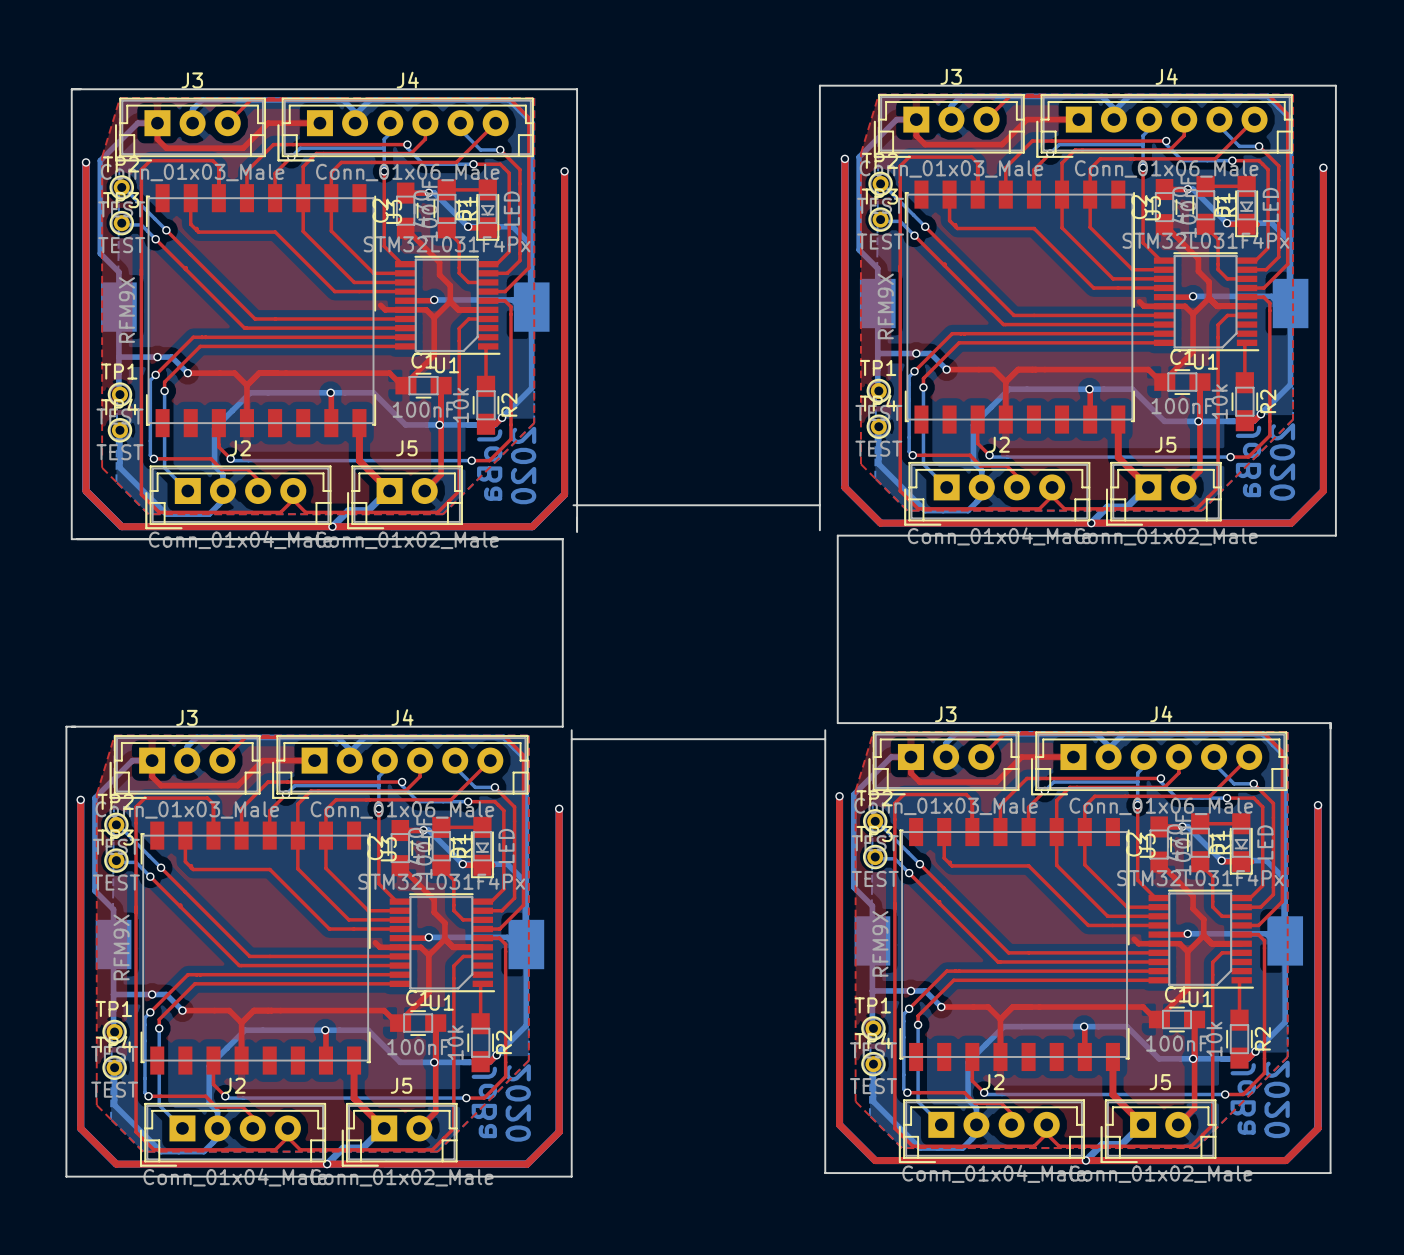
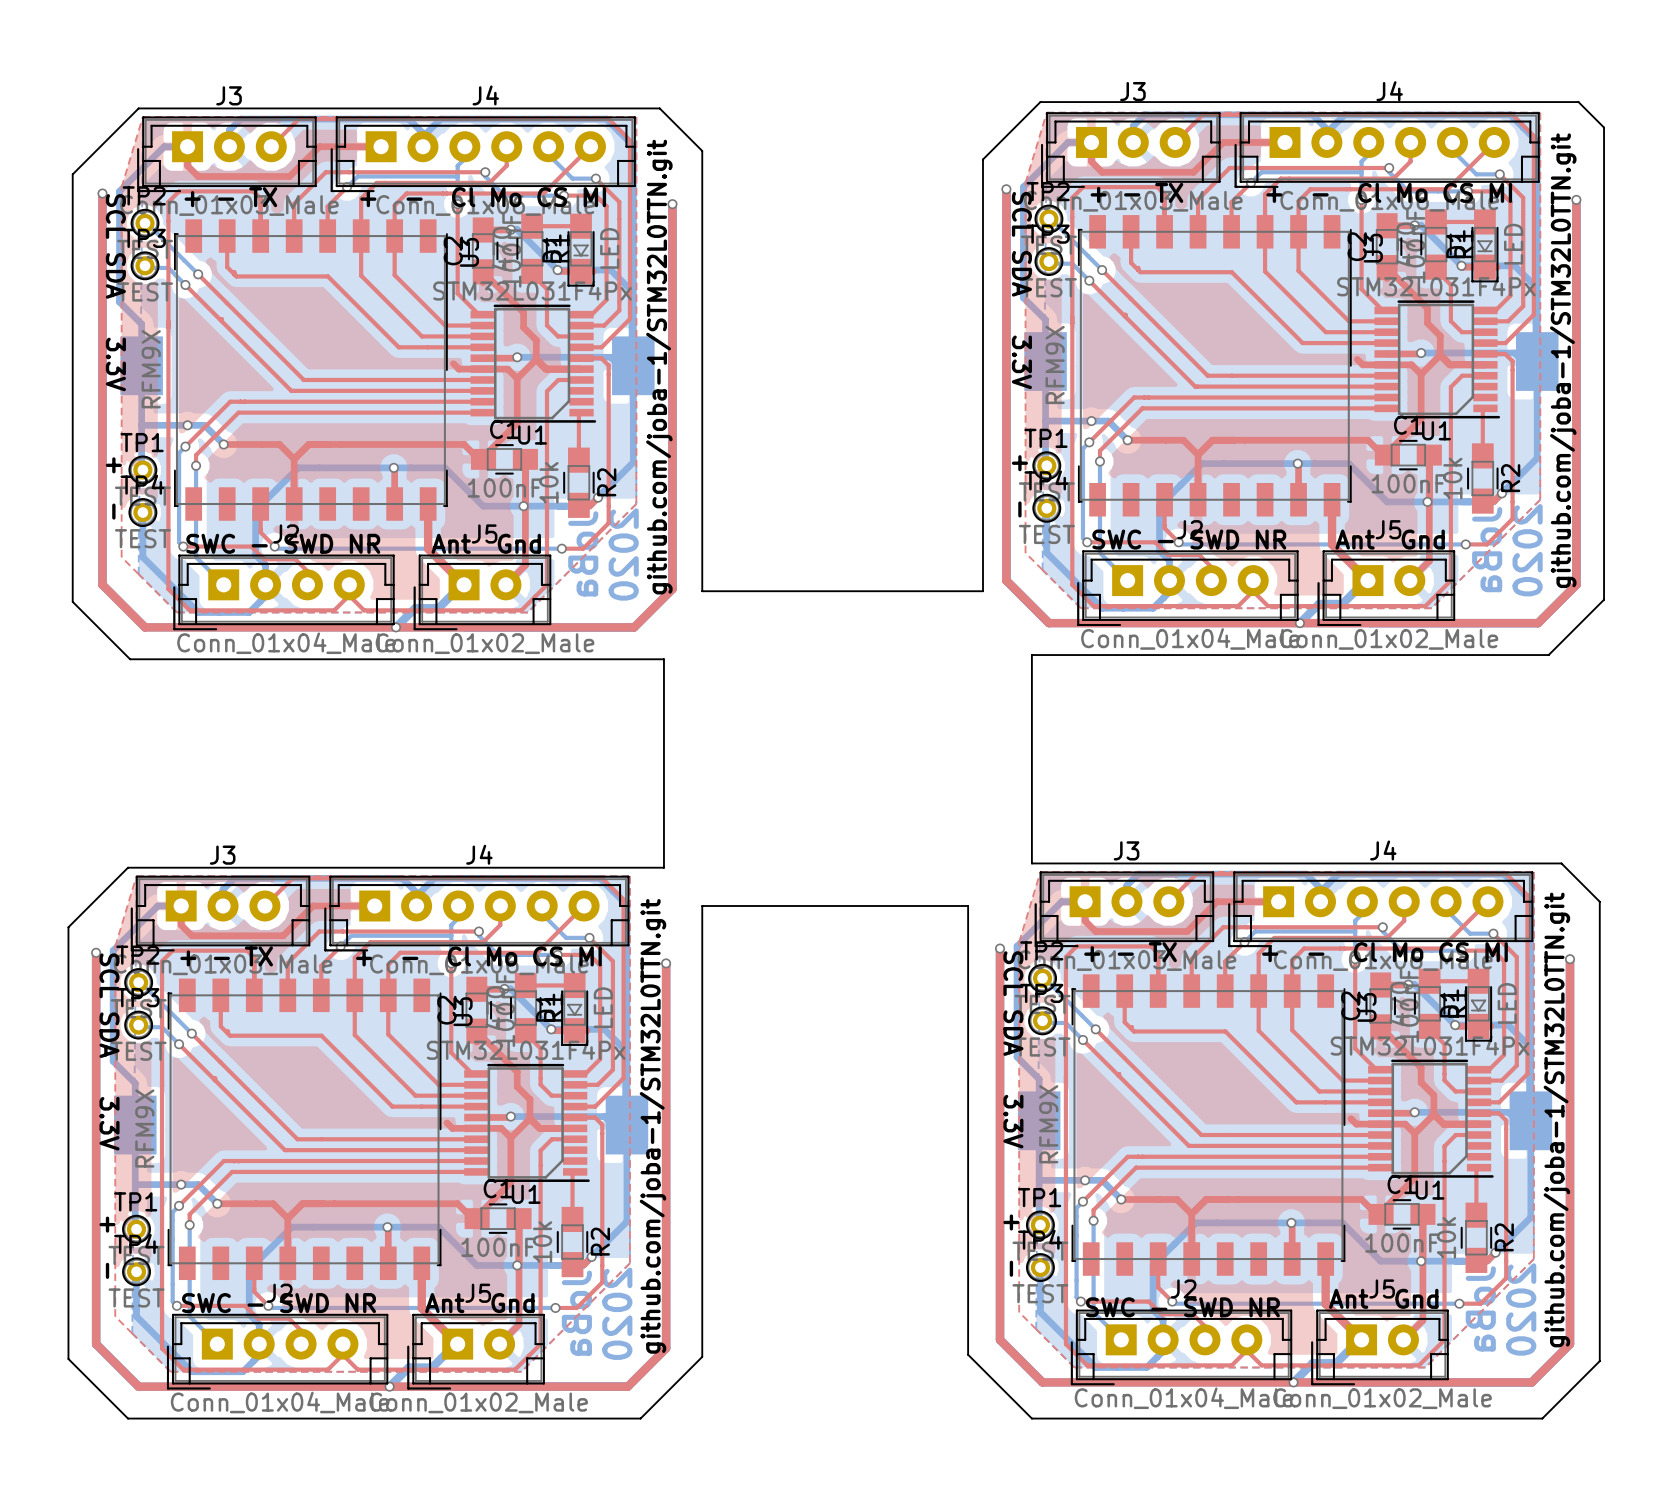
board edge: (873, 85) (819, 85) (819, 530) -> none
board edge: (1325, 85) (1335, 85) (1335, 535) (837, 535) (837, 723) (1330, 723) (1330, 1173) (825, 1173) (825, 730) -> (1578, 102) (1604, 127) (1604, 599) (1548, 655) (1031, 655) (1031, 863) (1561, 863) (1599, 901) (1599, 1361) (1542, 1418) (1031, 1418) (968, 1354) (968, 905) (702, 905) (702, 1356) (640, 1418) (128, 1418) (68, 1359) (68, 927) (128, 867) (663, 867) (663, 659) (130, 659) (72, 601) (72, 174) (138, 108) (659, 108) (702, 150) (702, 591) (983, 591) (983, 159) (1040, 102)
text: none -> + - TX (1136, 192)
text: none -> + - Cl Mo CS MI (1389, 192)
text: none -> + - TX (230, 197)
text: none -> + - Cl Mo CS MI (483, 197)
text: none -> SCL SDA 3.3V + - (1021, 354)
text: none -> SCL SDA 3.3V + - (115, 356)
text: none -> github.com/joba-1/STM32L0TTN.git (1563, 360)
text: none -> github.com/joba-1/STM32L0TTN.git (659, 367)
text: none -> SWC - SWD NR (1189, 539)
text: none -> Ant Gnd (1390, 539)
text: none -> SWC - SWD NR (283, 543)
text: none -> Ant Gnd (486, 543)
board edge: (573, 505) (819, 505) -> none
board edge: (577, 532) (577, 89) (71, 89) (71, 539) (562, 539) (562, 726) (66, 726) (66, 1176) (571, 1176) (571, 730) -> none
board edge: (571, 739) (825, 739) -> none
text: none -> + - TX (1130, 952)
text: none -> + - Cl Mo CS MI (1384, 952)
text: none -> + - TX (226, 956)
text: none -> + - Cl Mo CS MI (478, 956)
text: none -> SCL SDA 3.3V + - (1013, 1114)
text: none -> SCL SDA 3.3V + - (109, 1116)
text: none -> github.com/joba-1/STM32L0TTN.git (1556, 1120)
text: none -> github.com/joba-1/STM32L0TTN.git (652, 1126)
text: none -> Ant Gnd (1383, 1298)
text: none -> SWC - SWD NR (279, 1303)
text: none -> Ant Gnd (479, 1303)
text: none -> SWC - SWD NR (1182, 1307)

